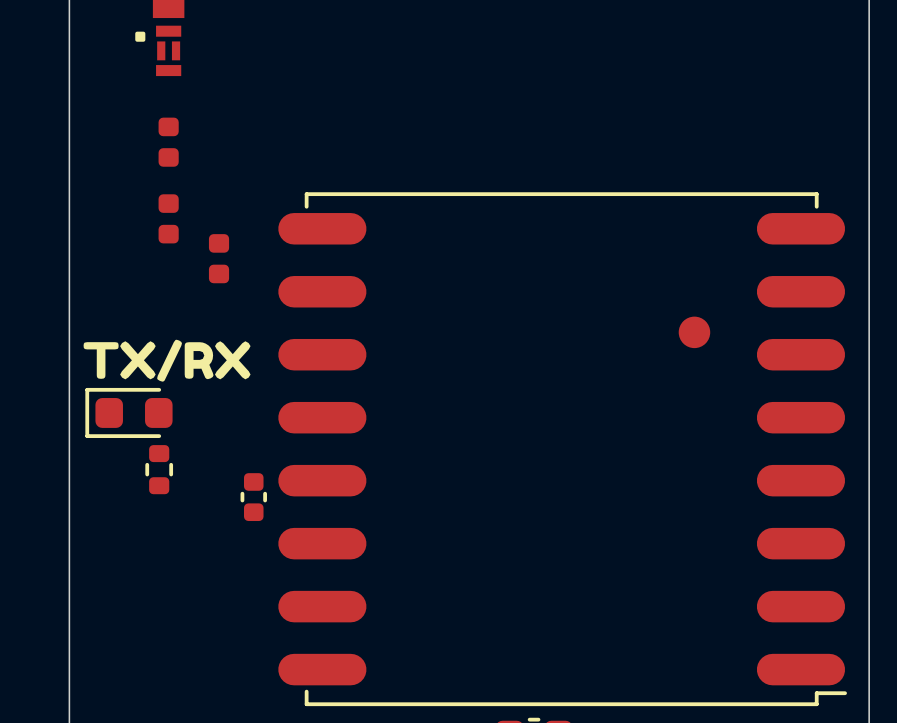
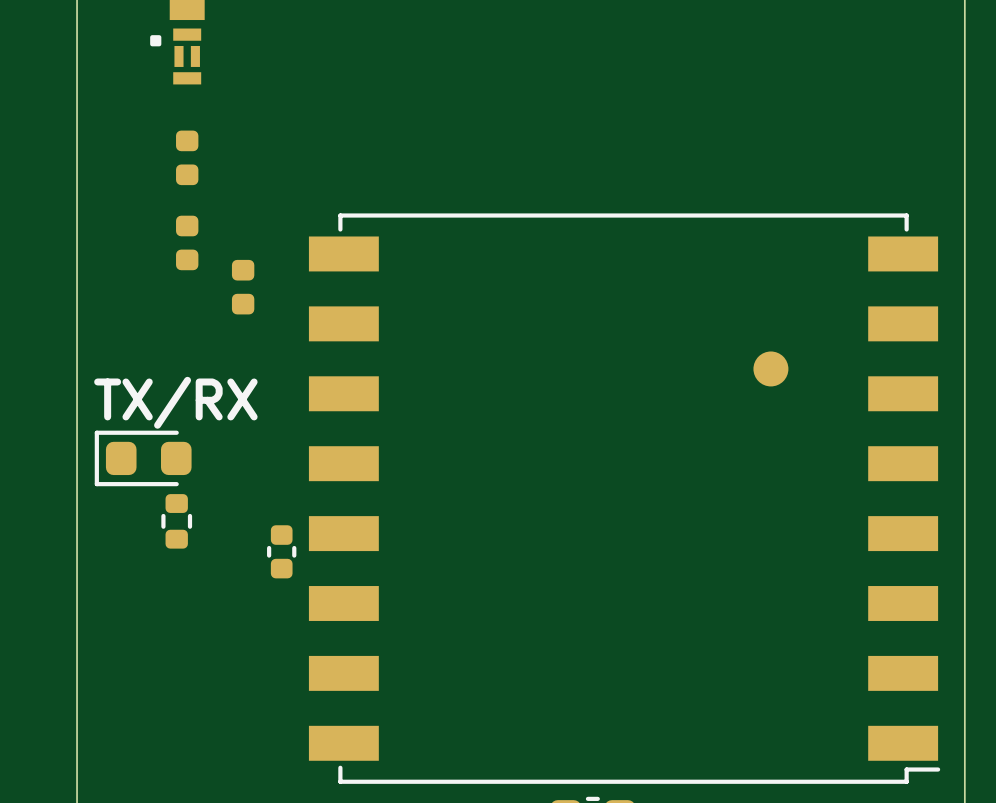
part footprint: [278, 192, 847, 707] -> [308, 213, 941, 784]
drawing: [83, 339, 251, 382] -> none
text: none -> TX/RX (175, 402)

